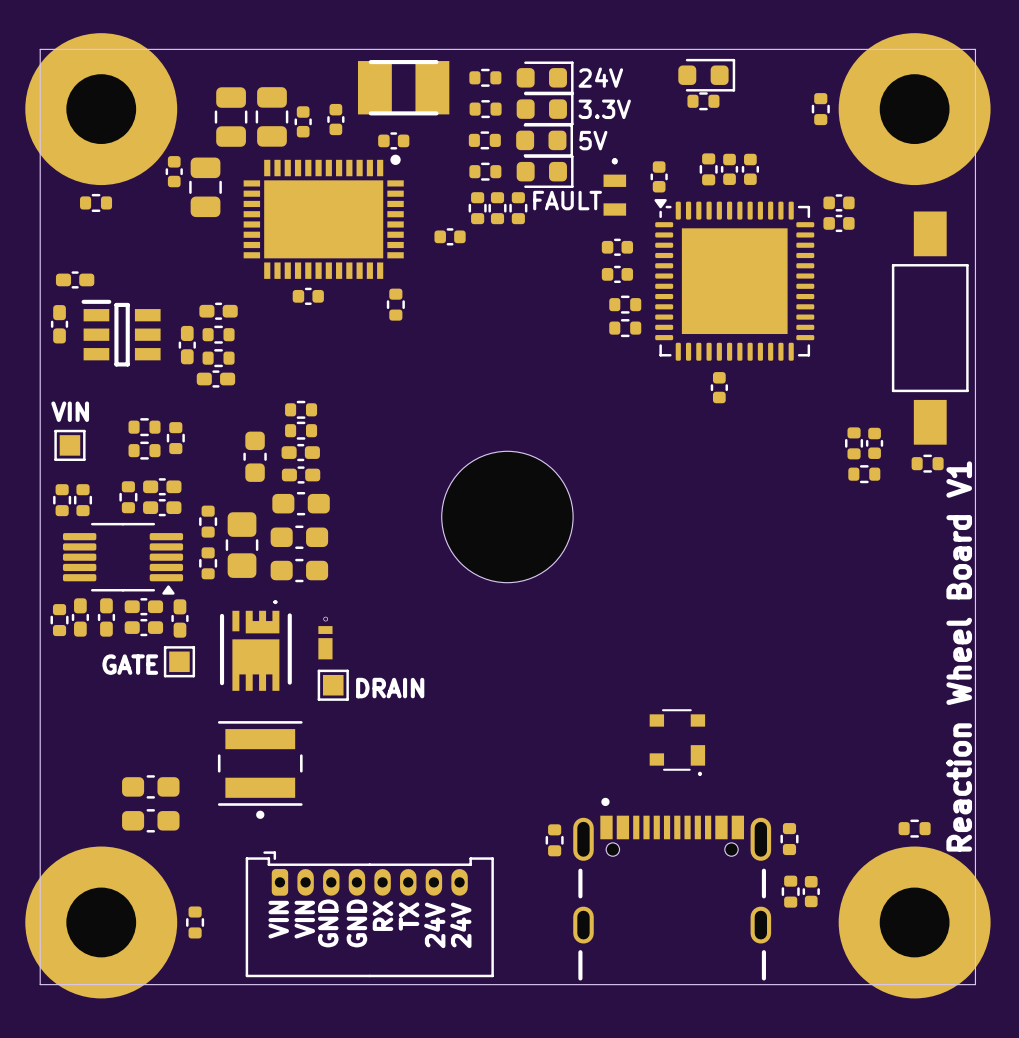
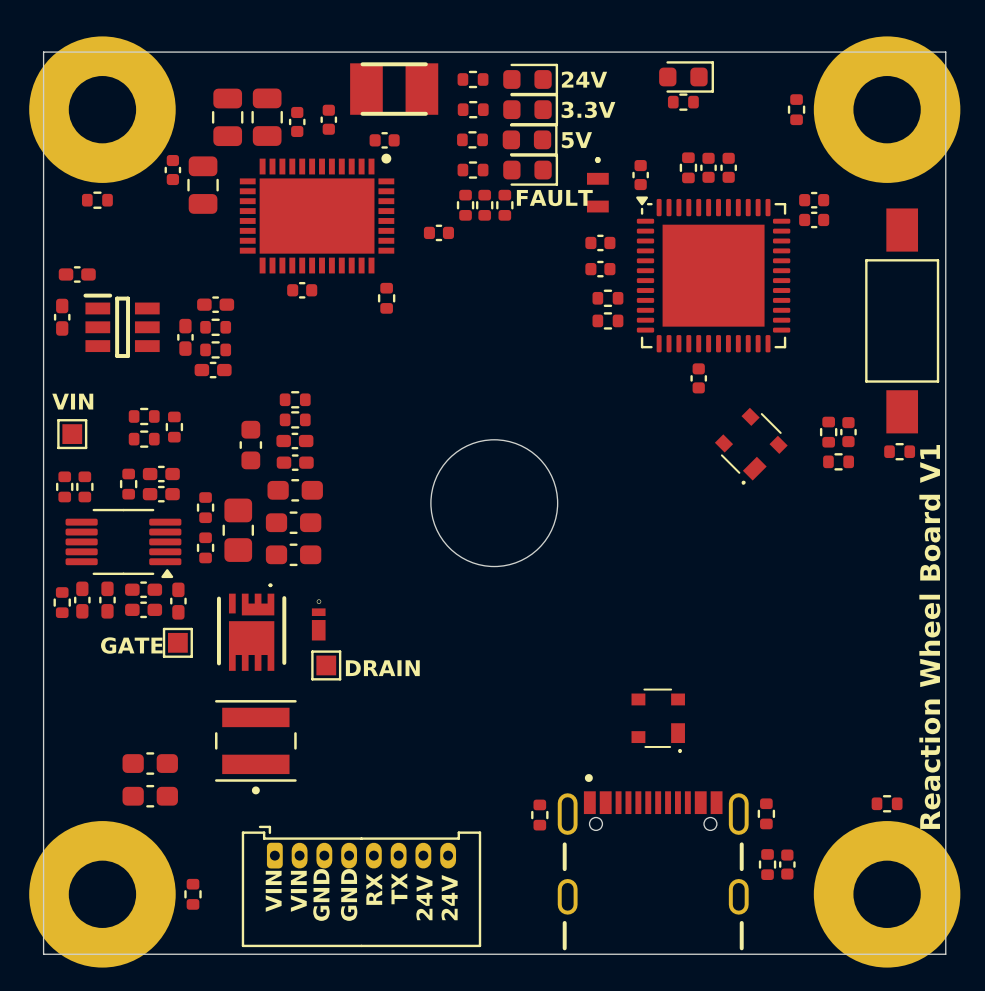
part: none -> (751, 446)

